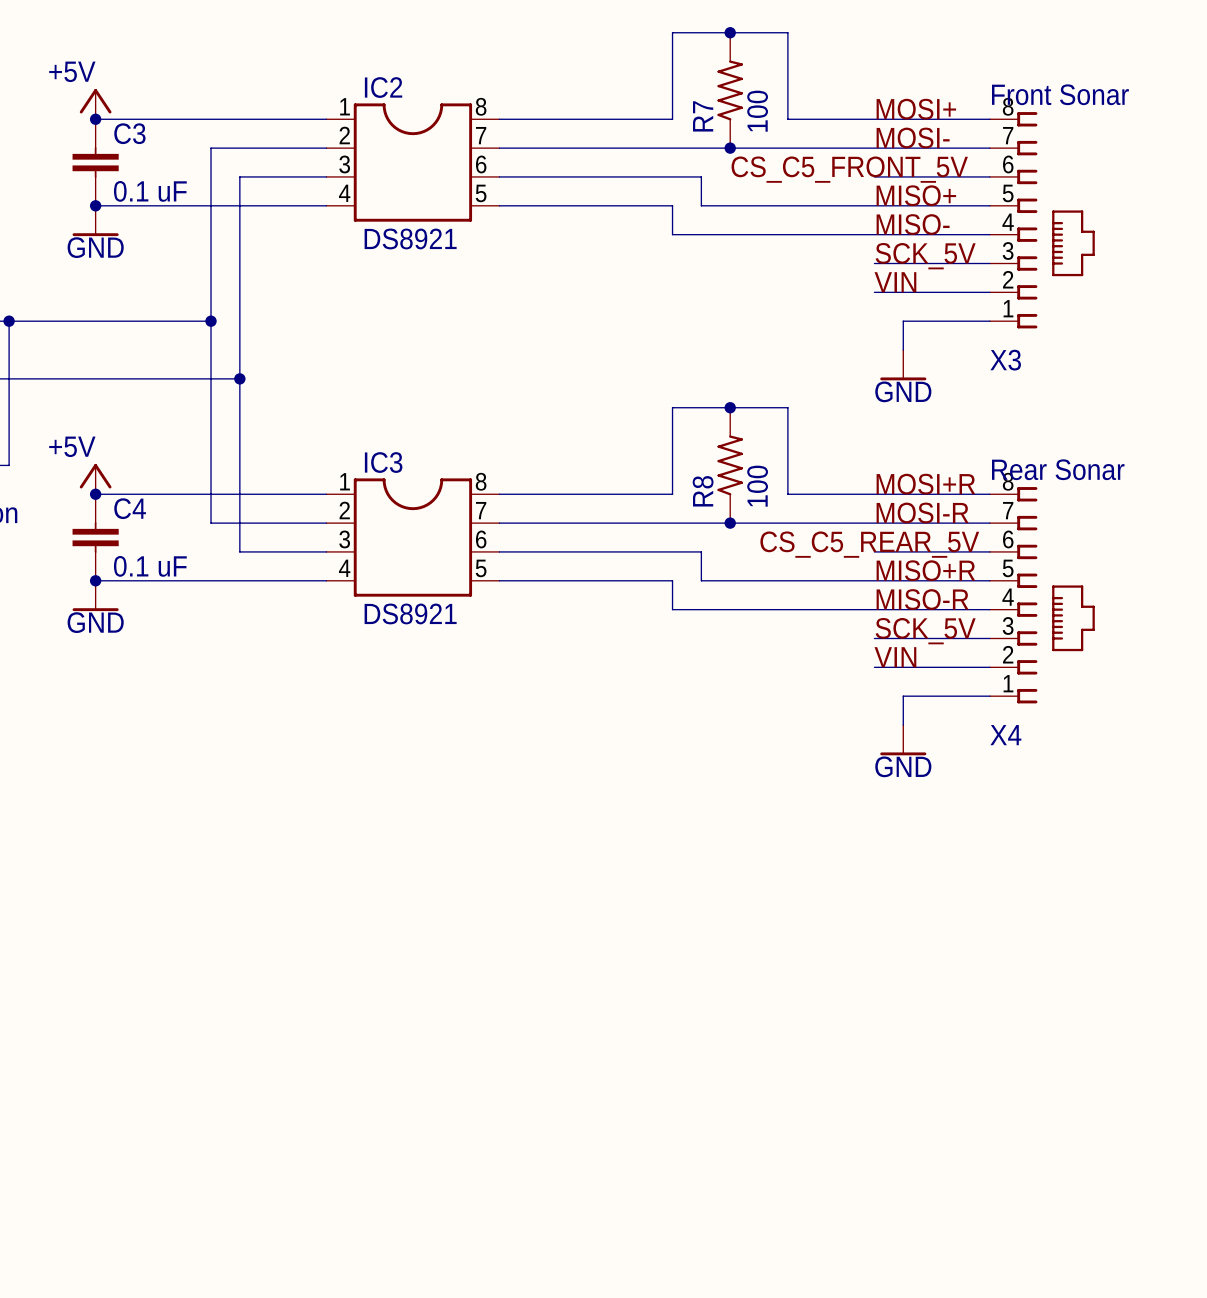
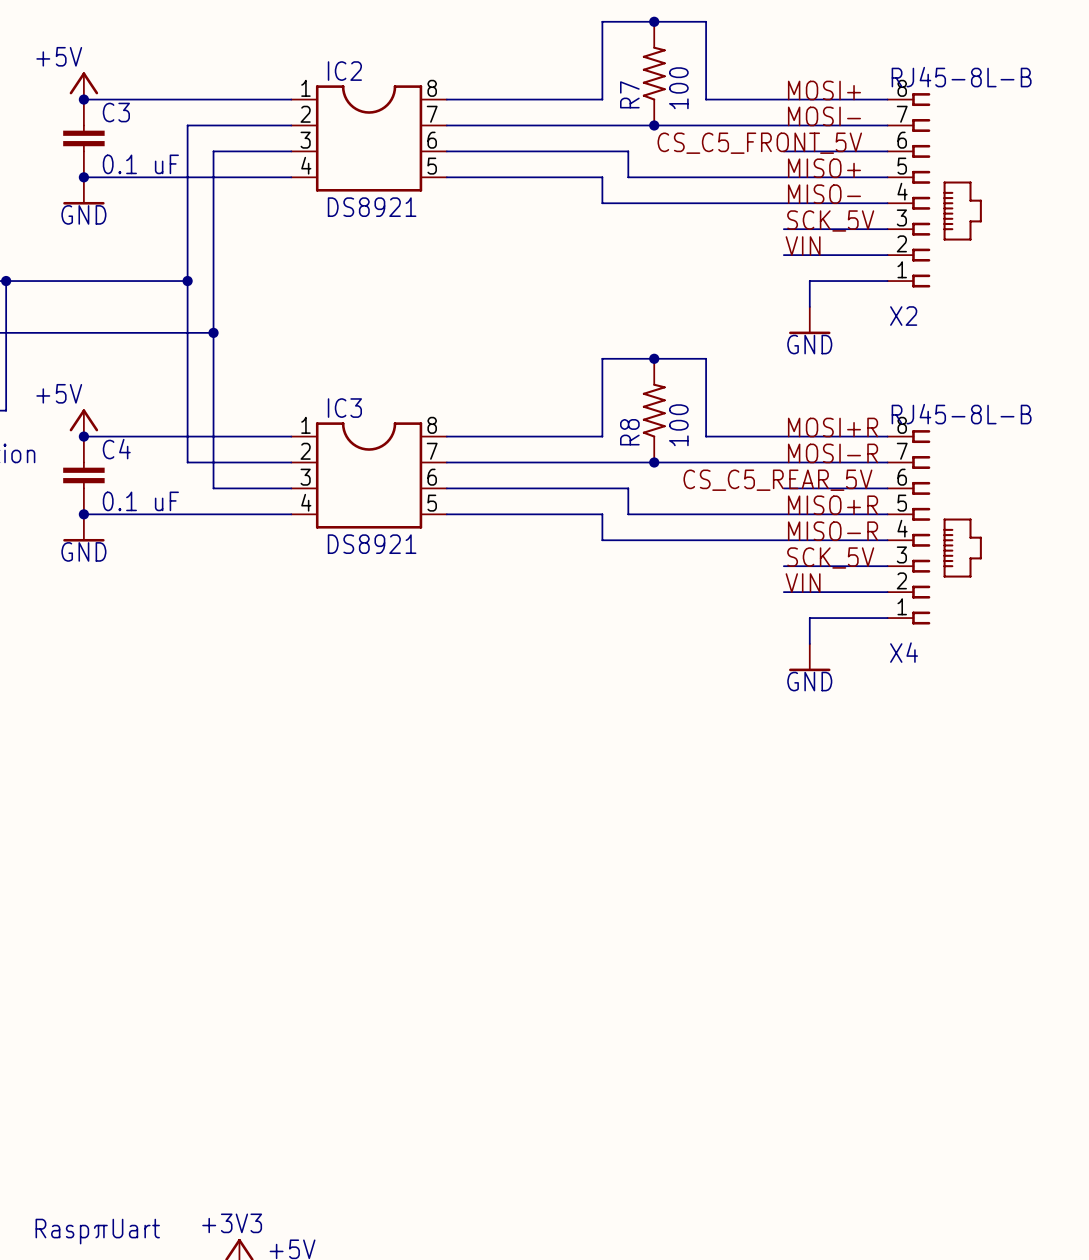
X3 value: Front Sonar (1060, 94) -> RJ45-8L-B (961, 77)
X3 name: X3 (1005, 360) -> X2 (903, 316)
X4 value: Rear Sonar (1058, 469) -> RJ45-8L-B (961, 414)

